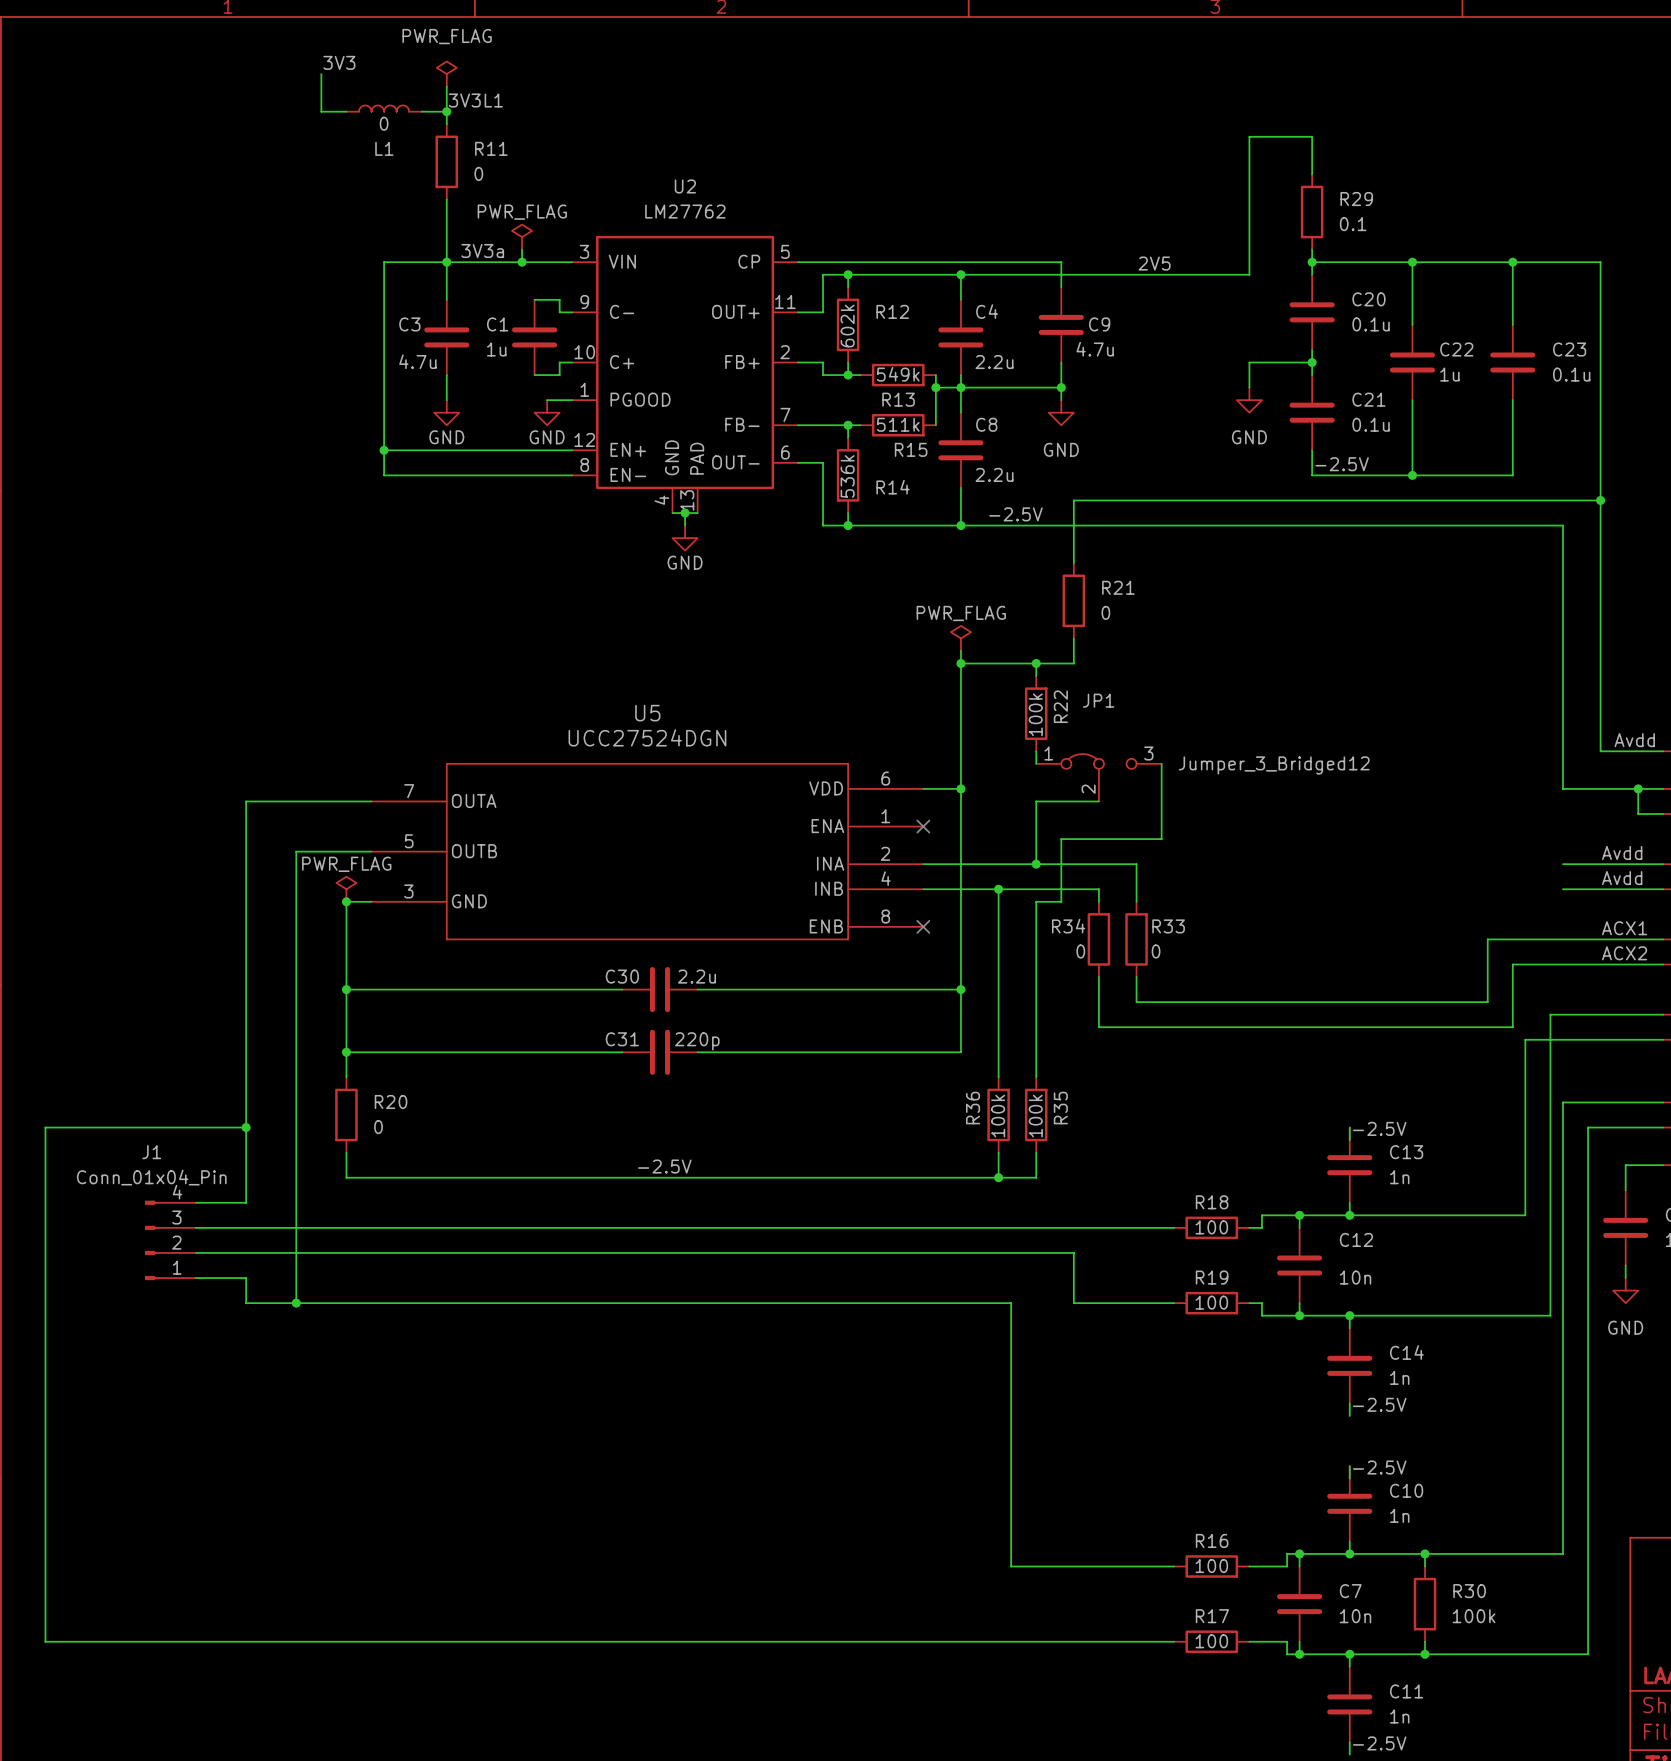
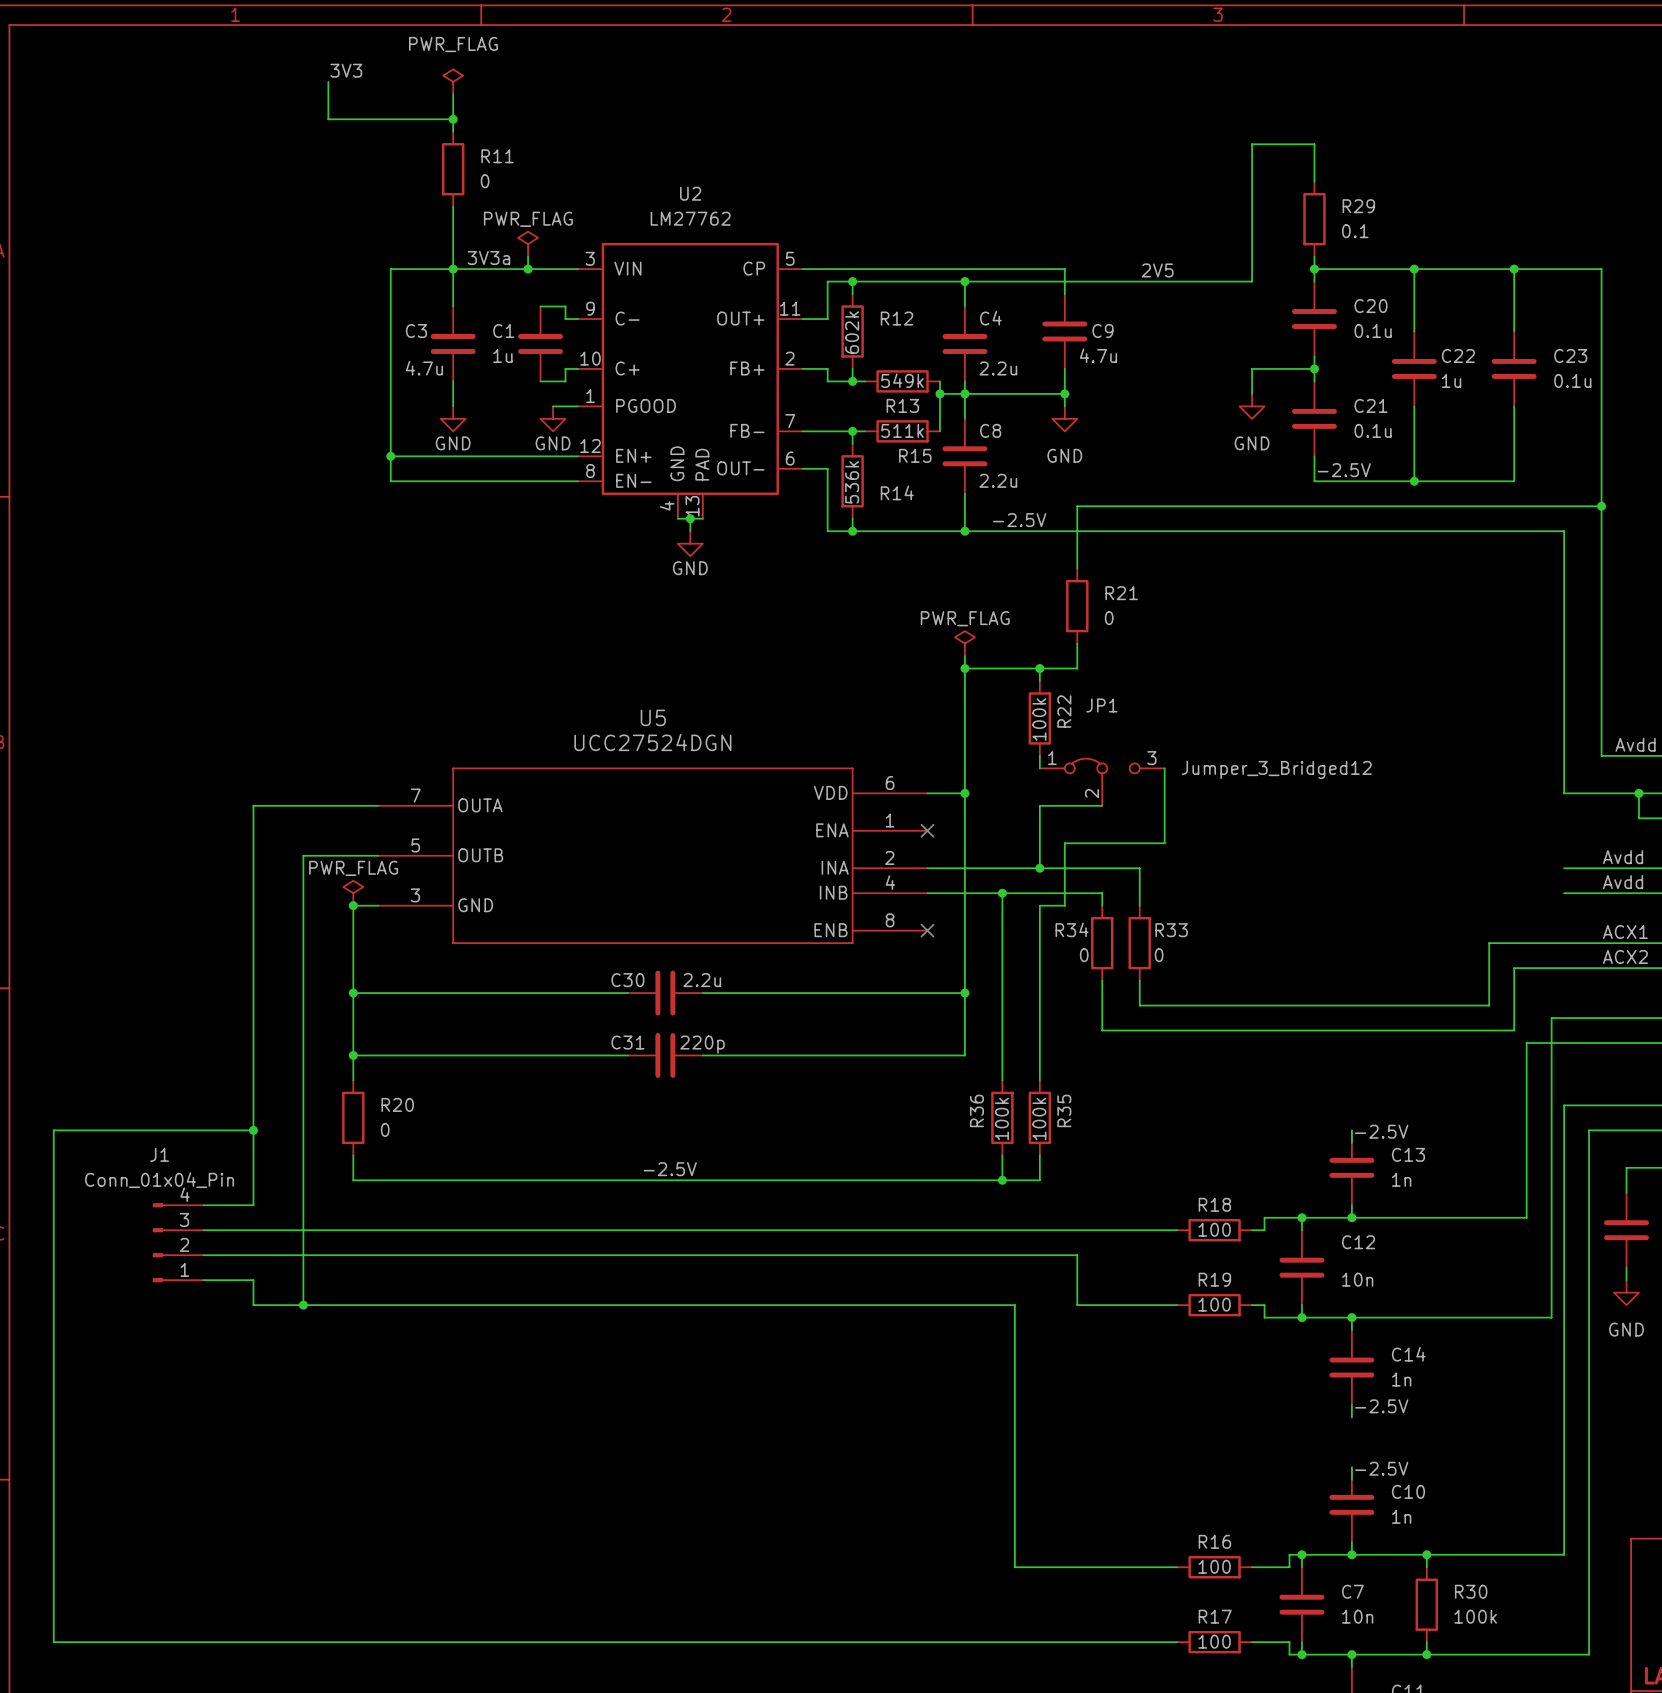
label: 3V3L1 (475, 100) -> none
L1: 0 (384, 108) -> none
wire: none -> (353, 119) (428, 119)

